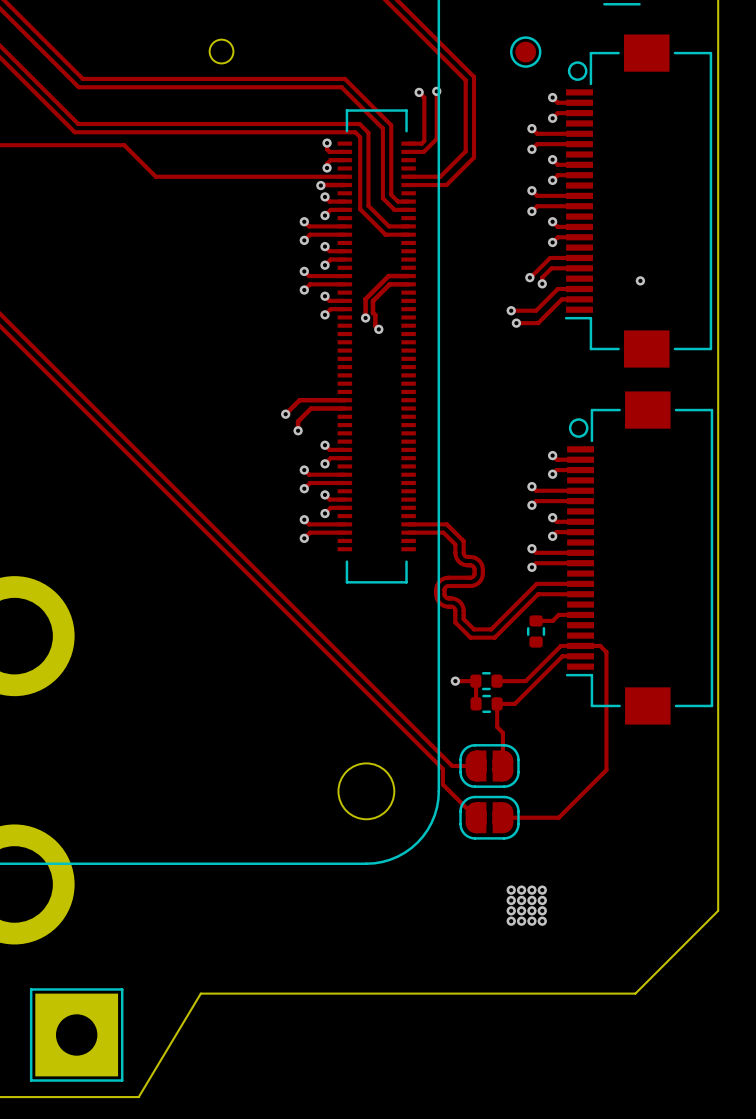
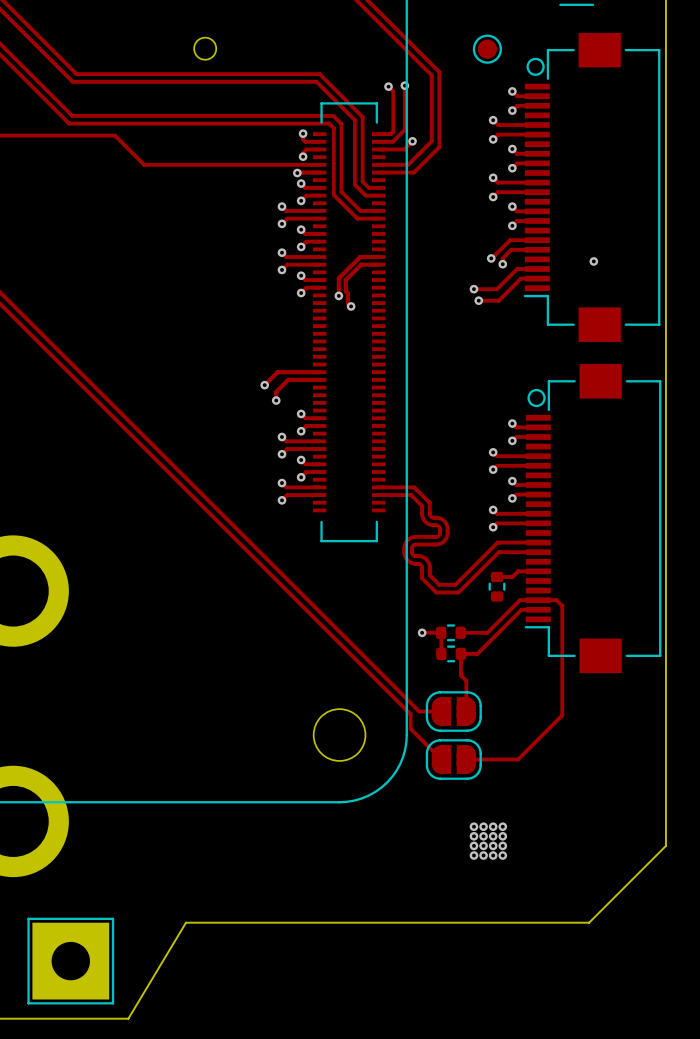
track: none -> (412, 141) (404, 149) (378, 149)
via: none -> (412, 141)

